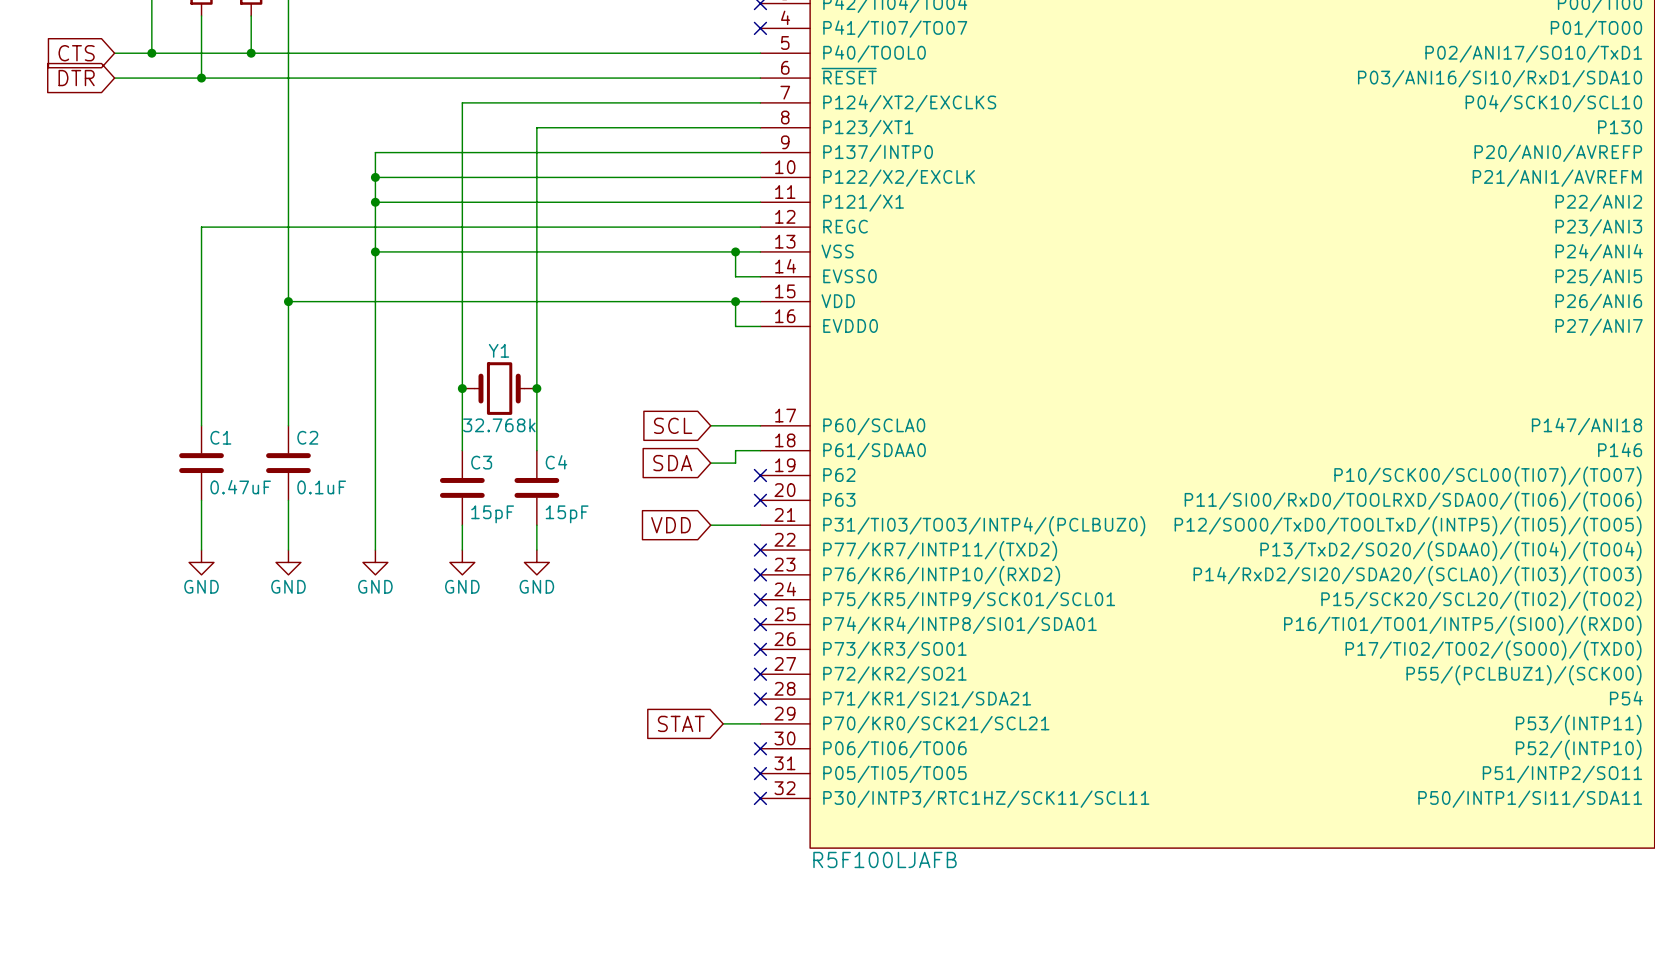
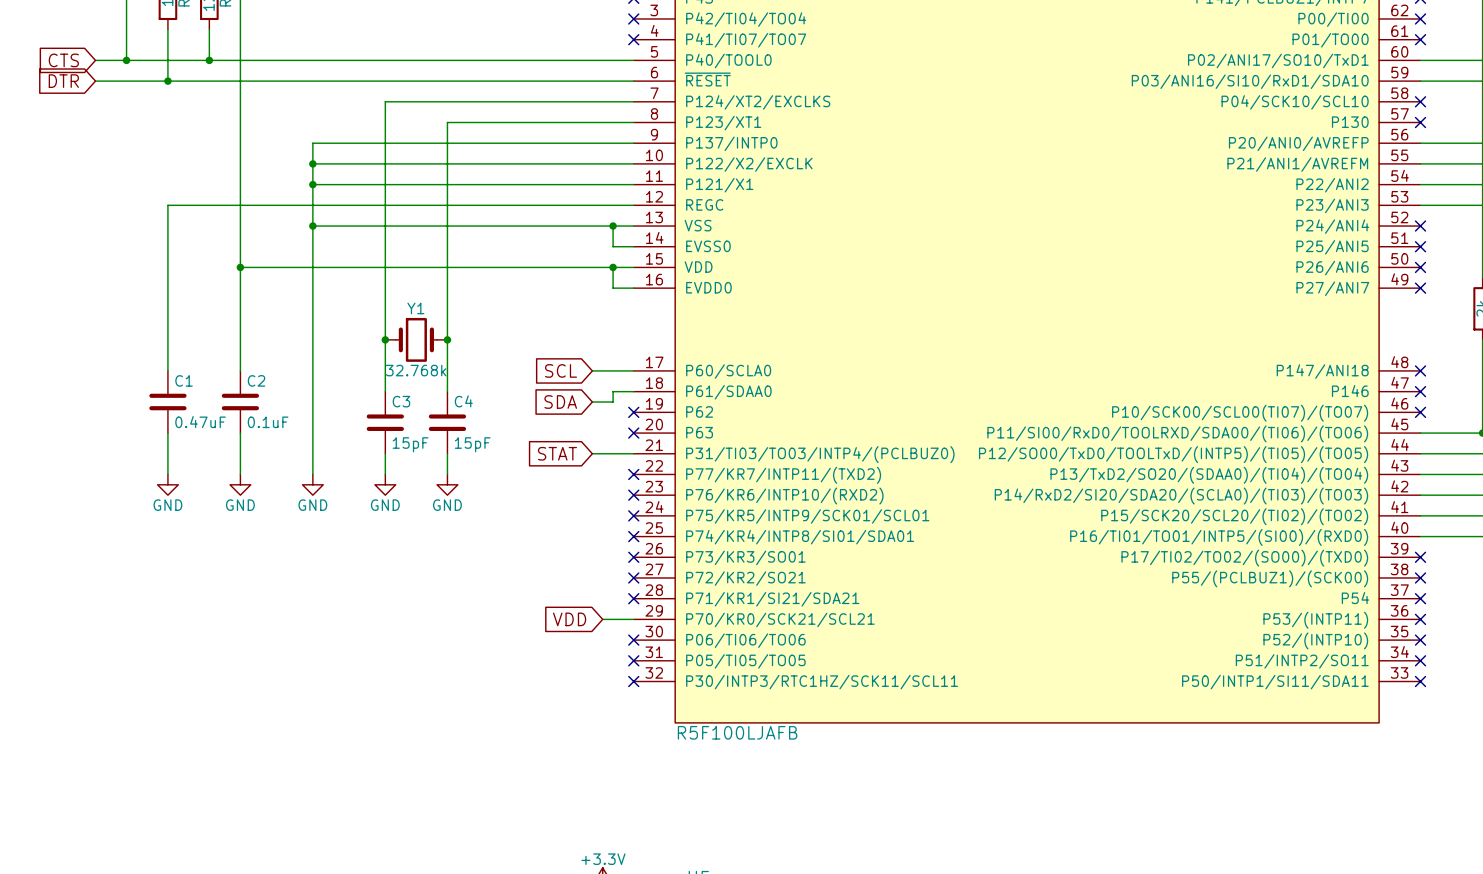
global label: VDD (671, 525) -> STAT (557, 453)
global label: STAT (681, 723) -> VDD (569, 619)

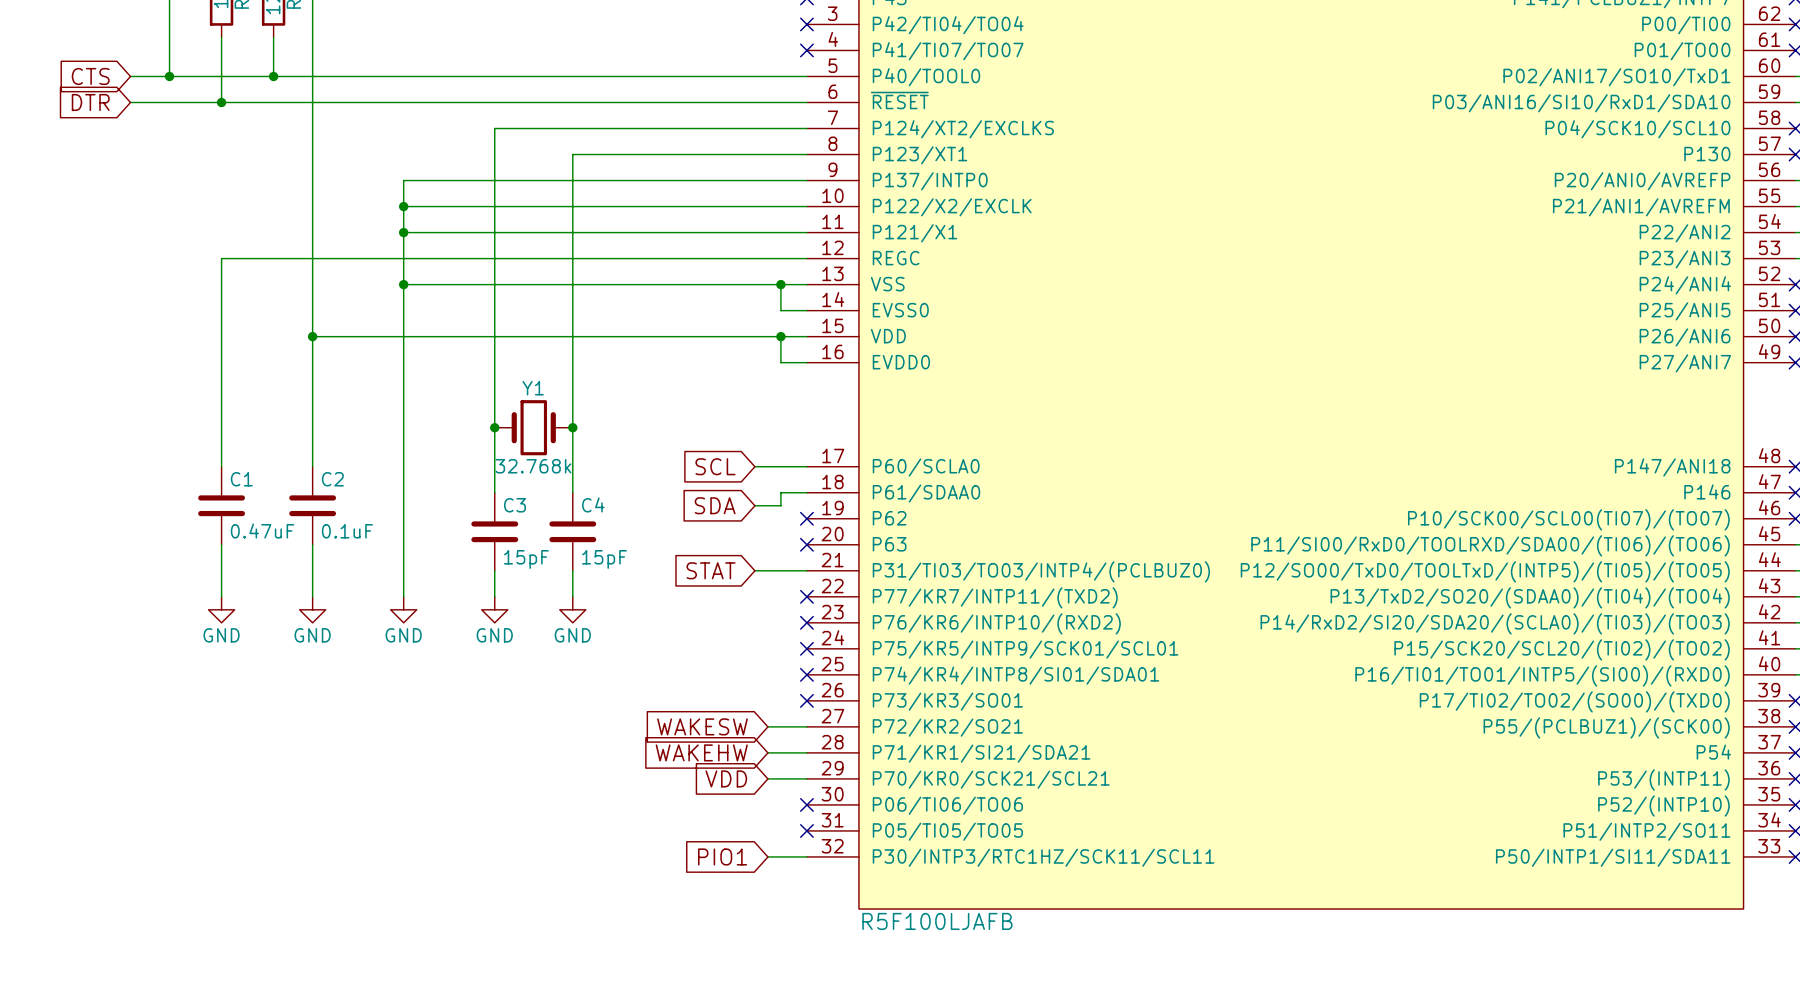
global label: none -> WAKESW (702, 726)
wire: none -> (767, 726) (806, 726)
no-connect mark: (633, 577) -> none
global label: none -> WAKEHW (701, 752)
wire: none -> (767, 752) (806, 752)
no-connect mark: (633, 598) -> none
global label: none -> PIO1 (722, 856)
wire: none -> (767, 856) (806, 856)
no-connect mark: (633, 681) -> none

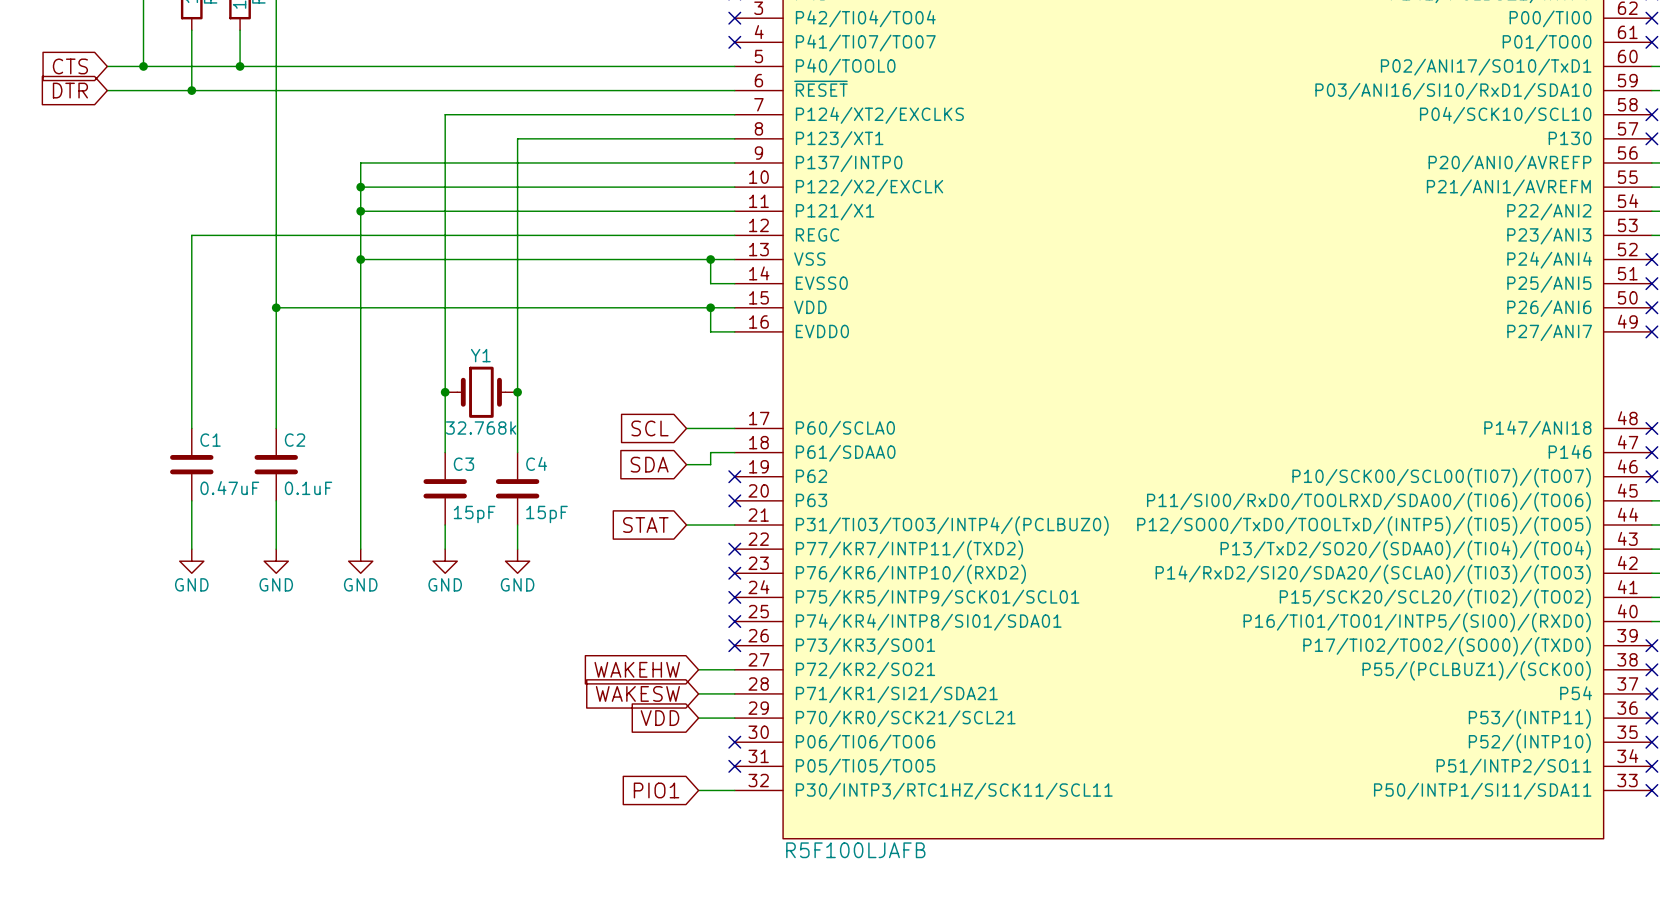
global label: WAKESW (702, 726) -> WAKEHW (637, 669)
global label: WAKEHW (701, 752) -> WAKESW (637, 693)

